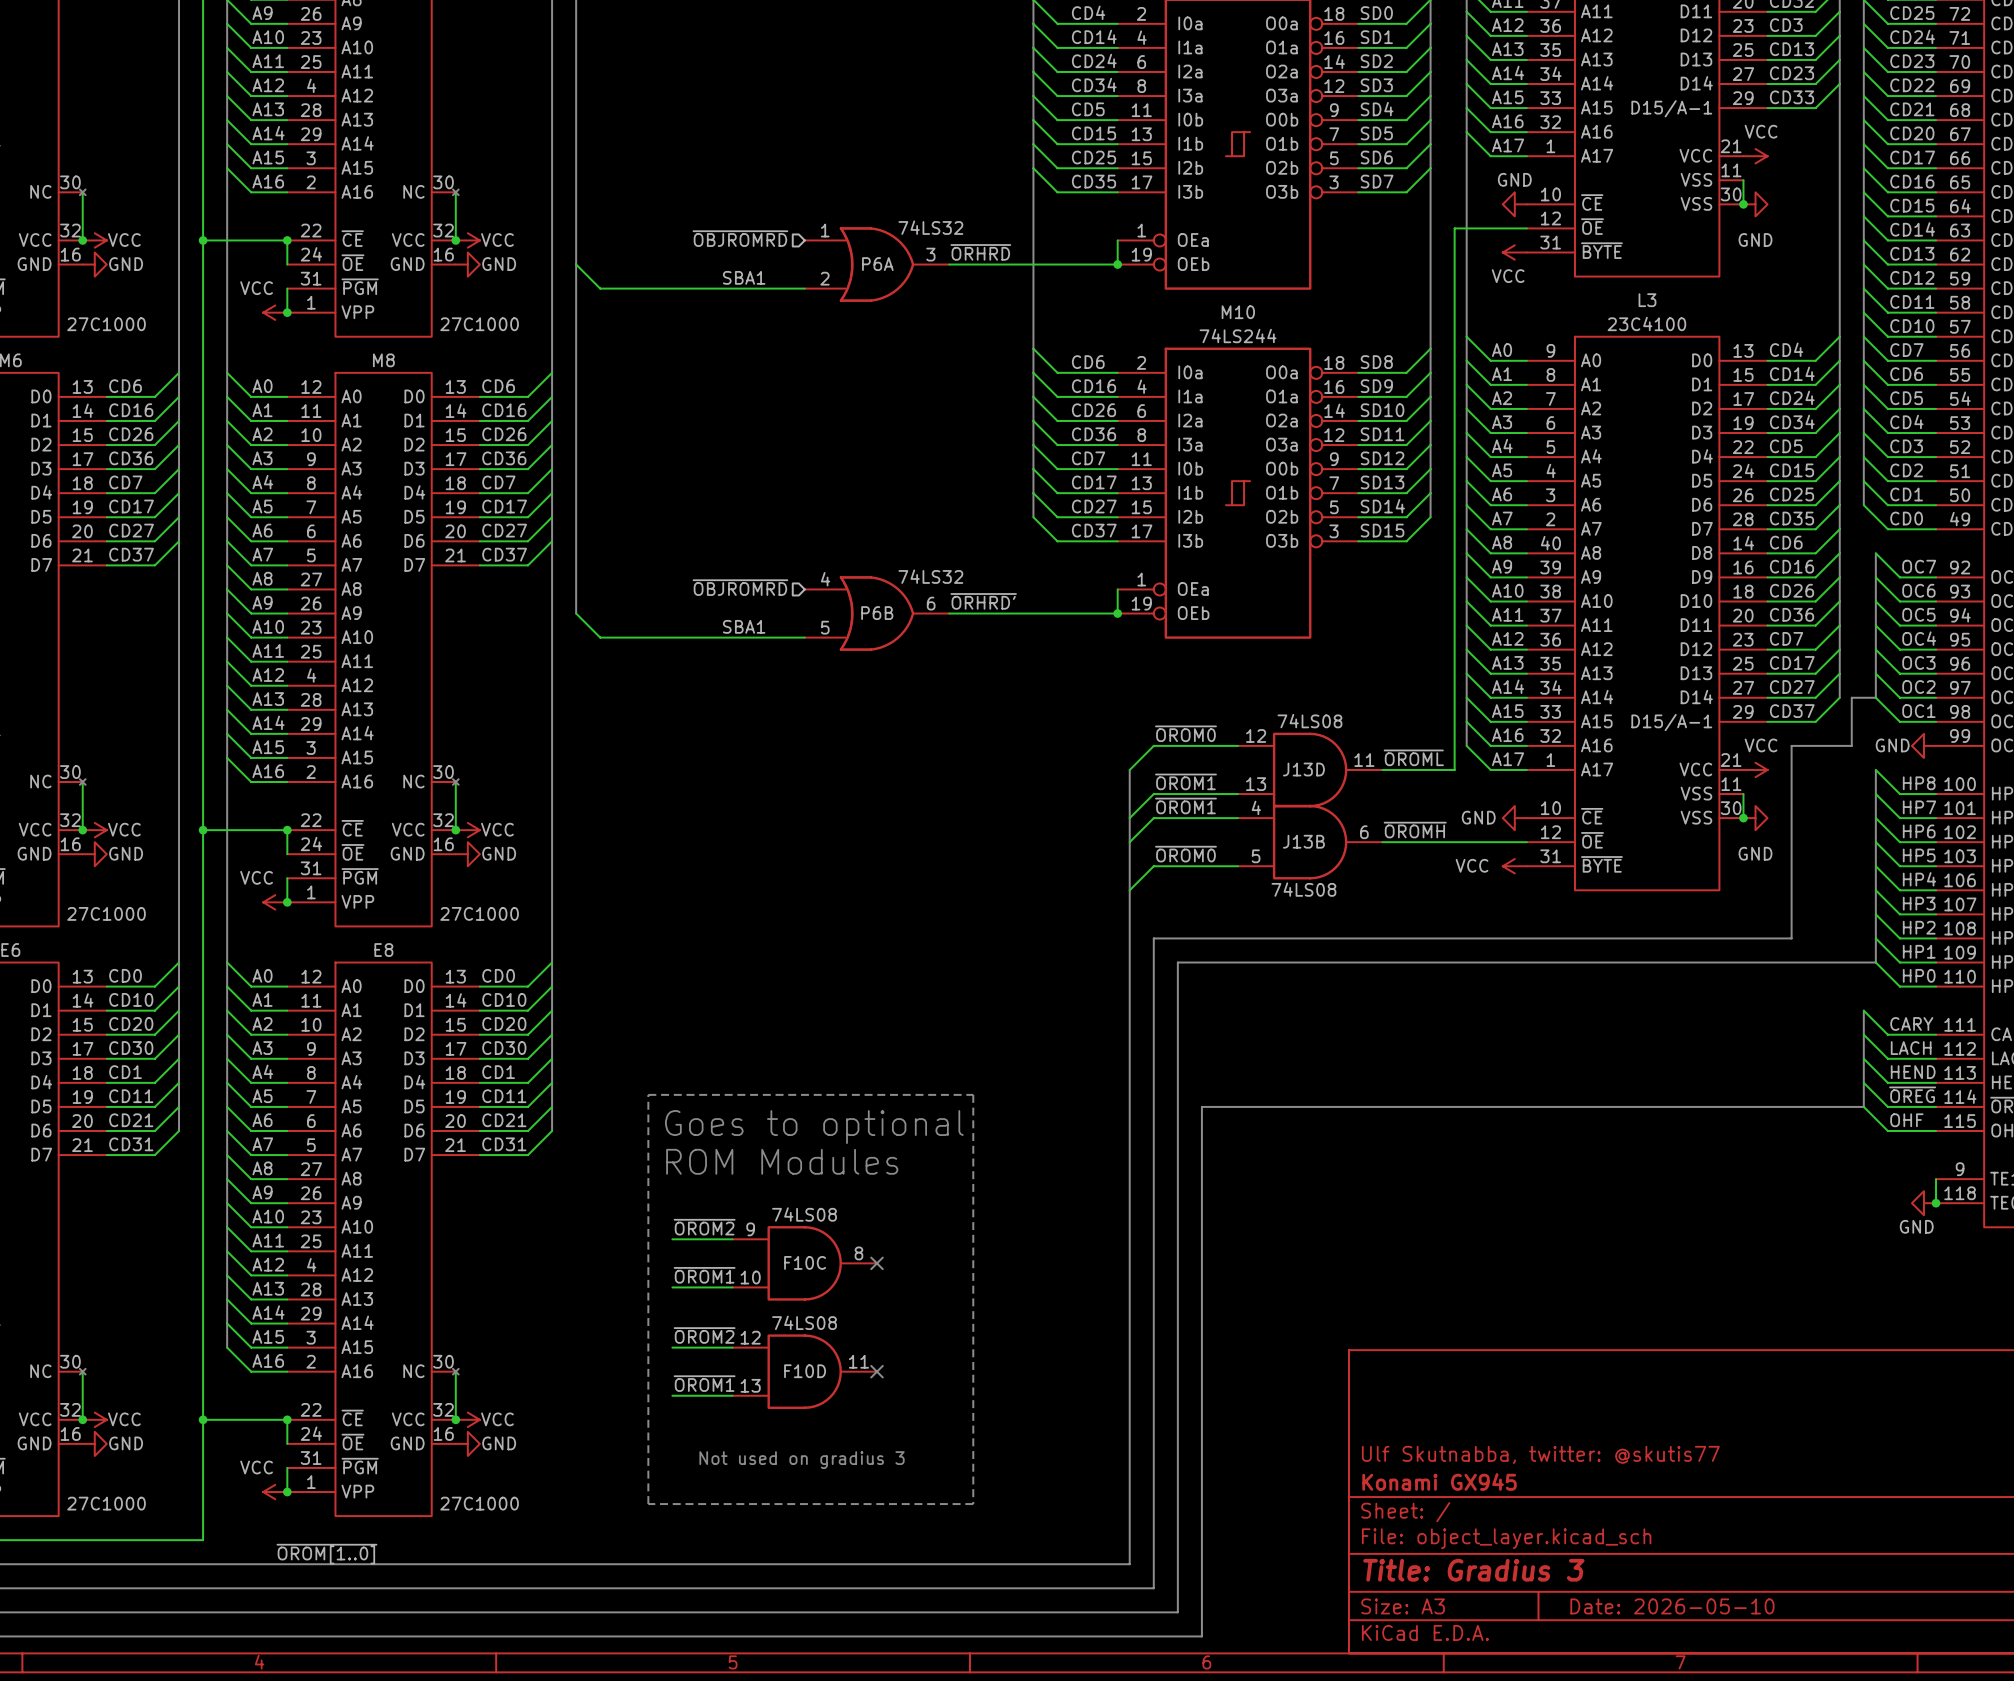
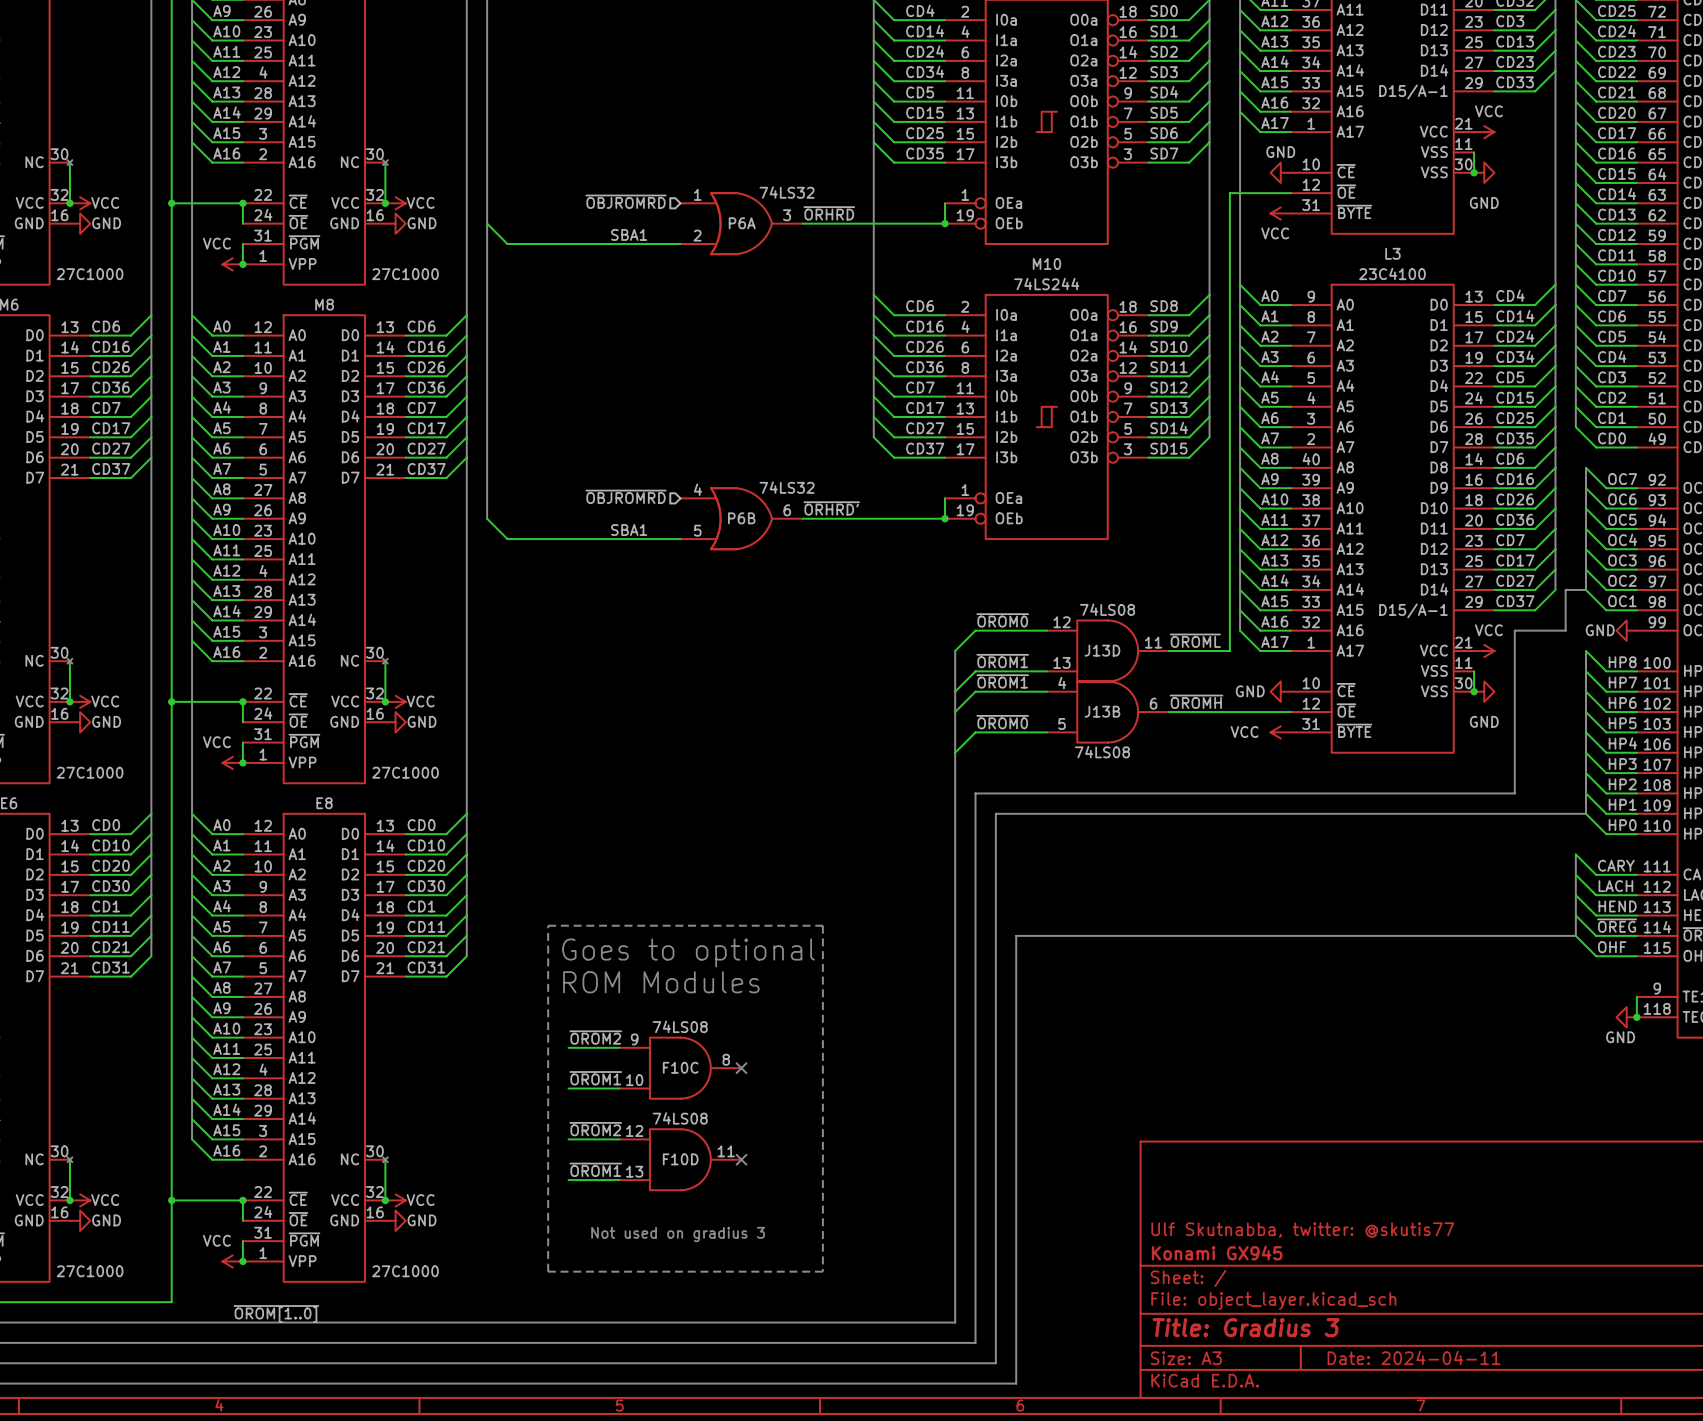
title block: Date: 2026-05-10 (1672, 1606) -> Date: 2024-04-11 (1414, 1357)

